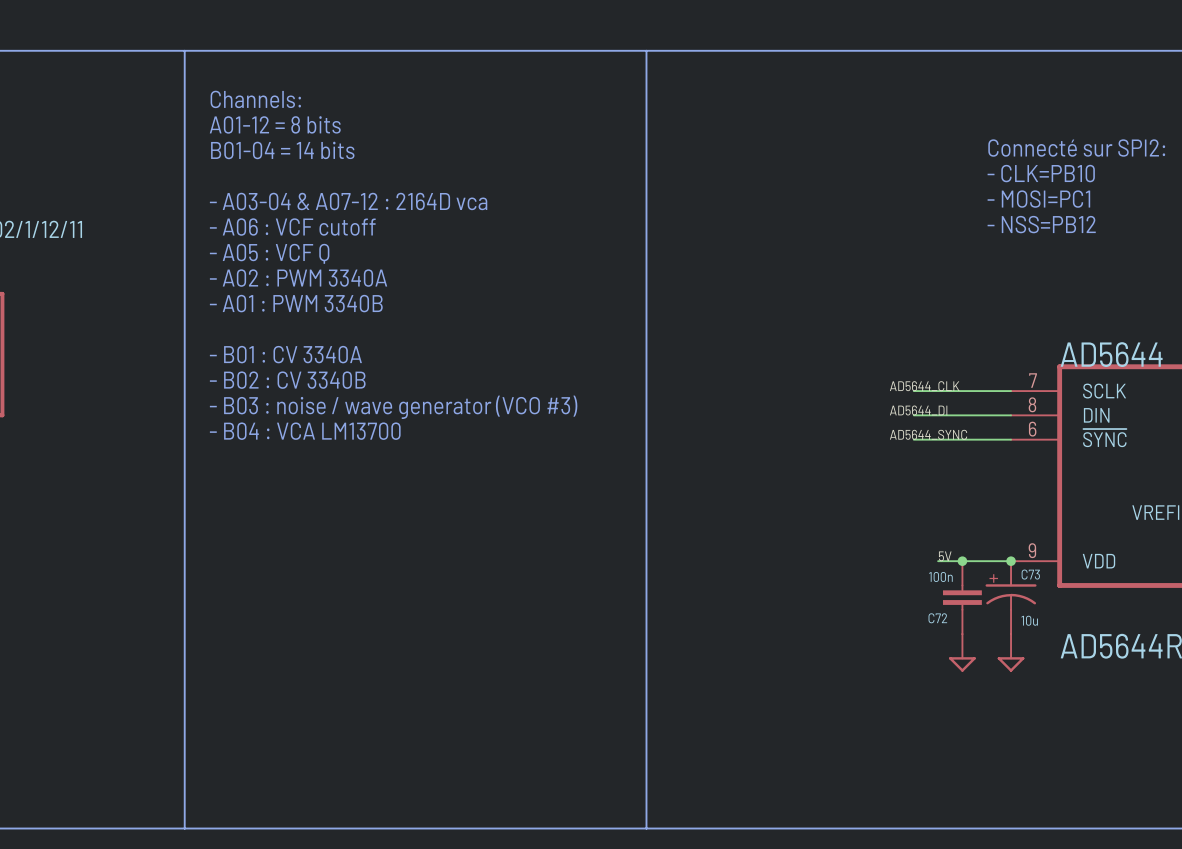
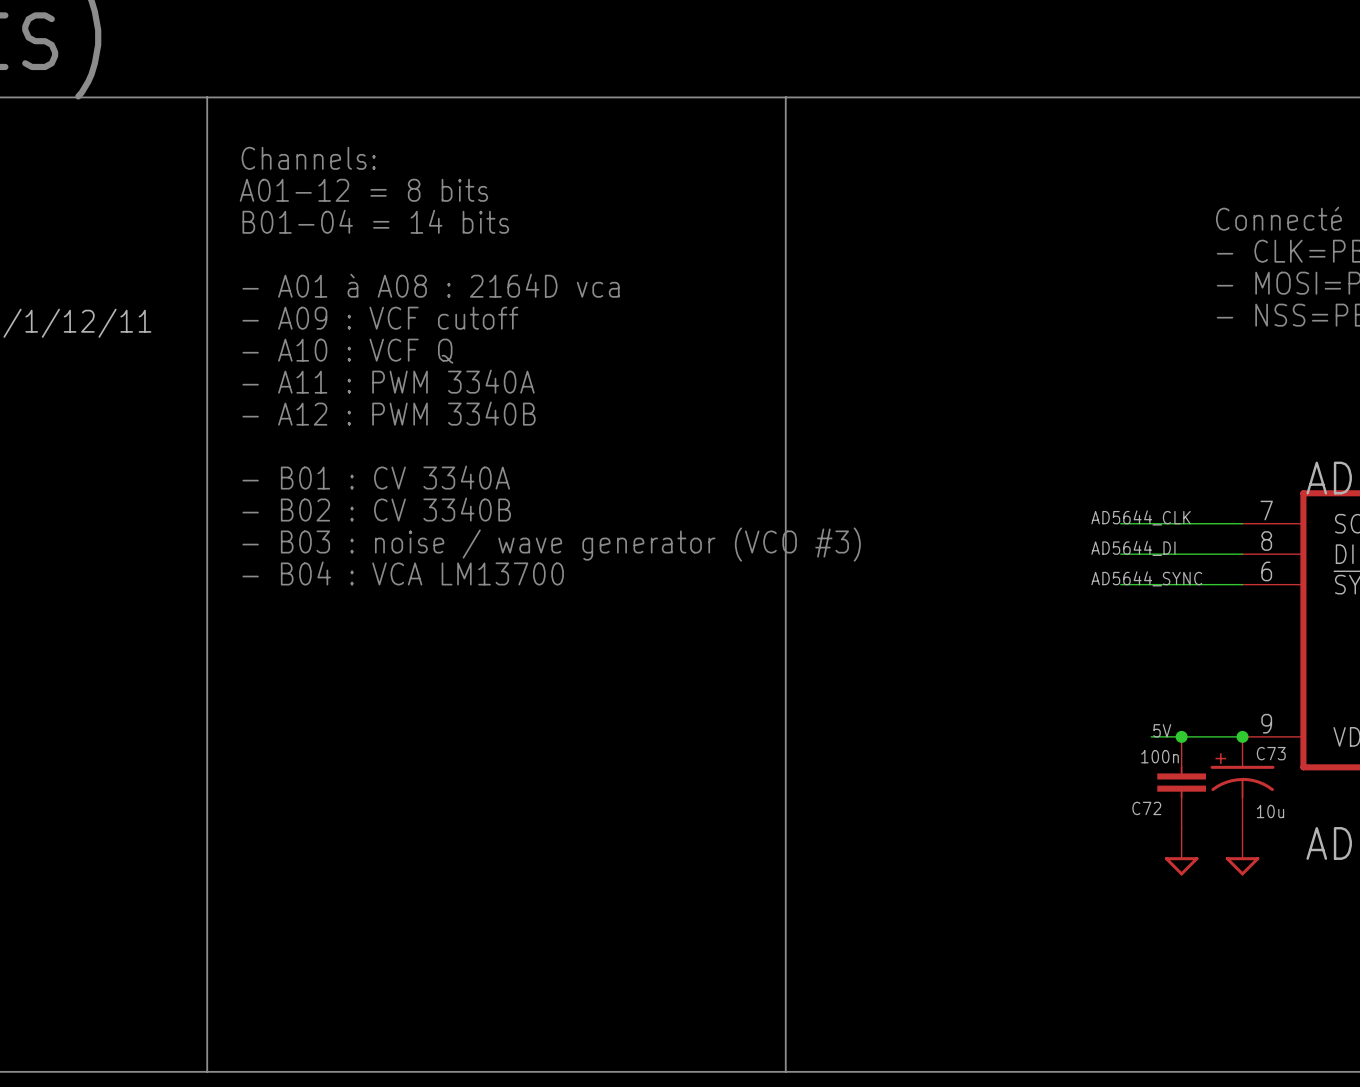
text: - A03-04 & A07-12 : 2164D vca (348, 201) -> - A01 à A08 : 2164D vca (431, 285)
text: - A06 : VCF cutoff (292, 227) -> - A09 : VCF cutoff (380, 318)
text: - A05 : VCF Q (269, 253) -> - A10 : VCF Q (347, 351)
text: - A02 : PWM 3340A (298, 278) -> - A11 : PWM 3340A (388, 381)
text: - A01 : PWM 3340B (296, 303) -> - A12 : PWM 3340B (389, 413)

